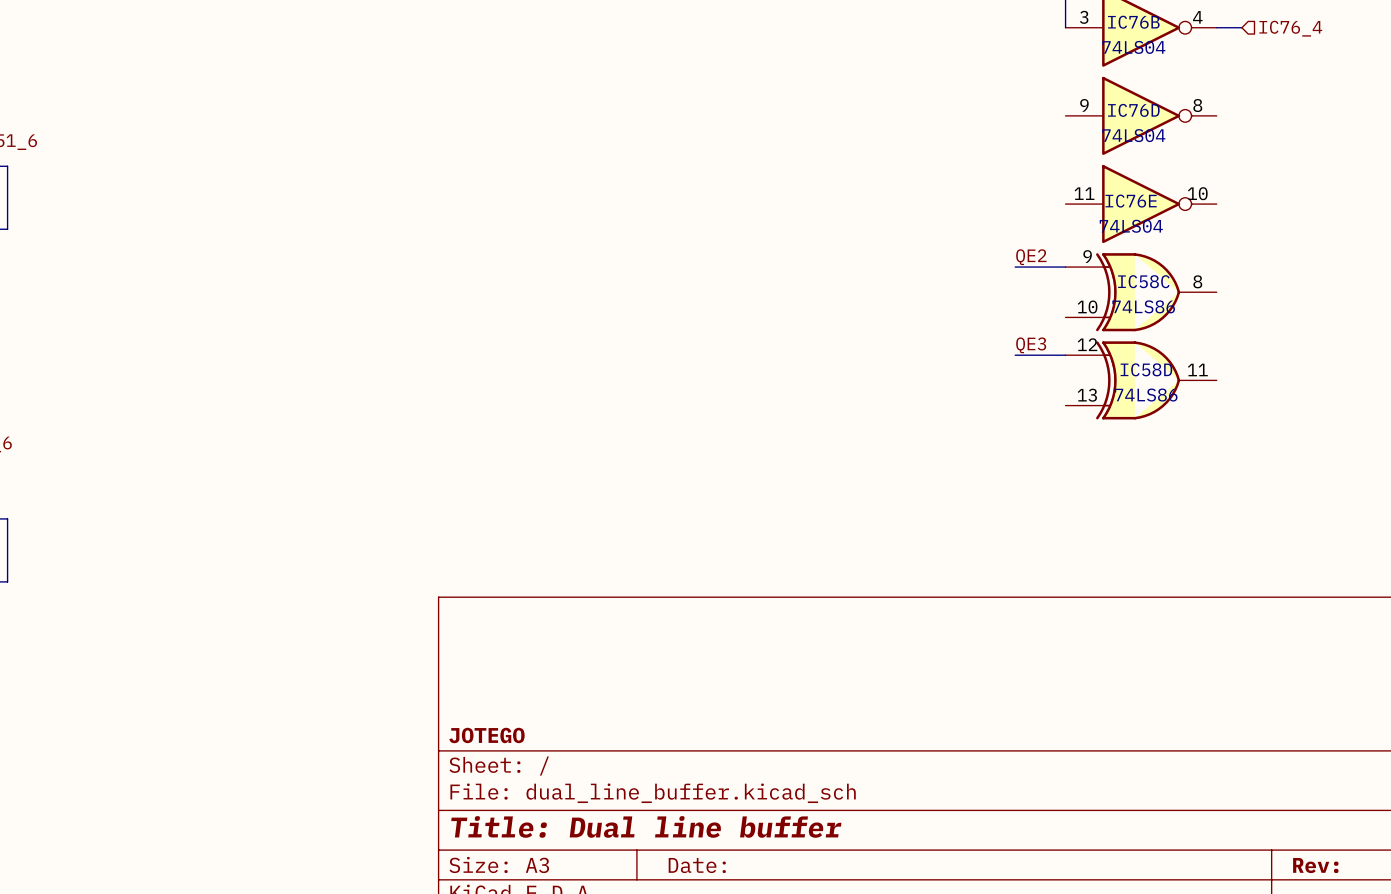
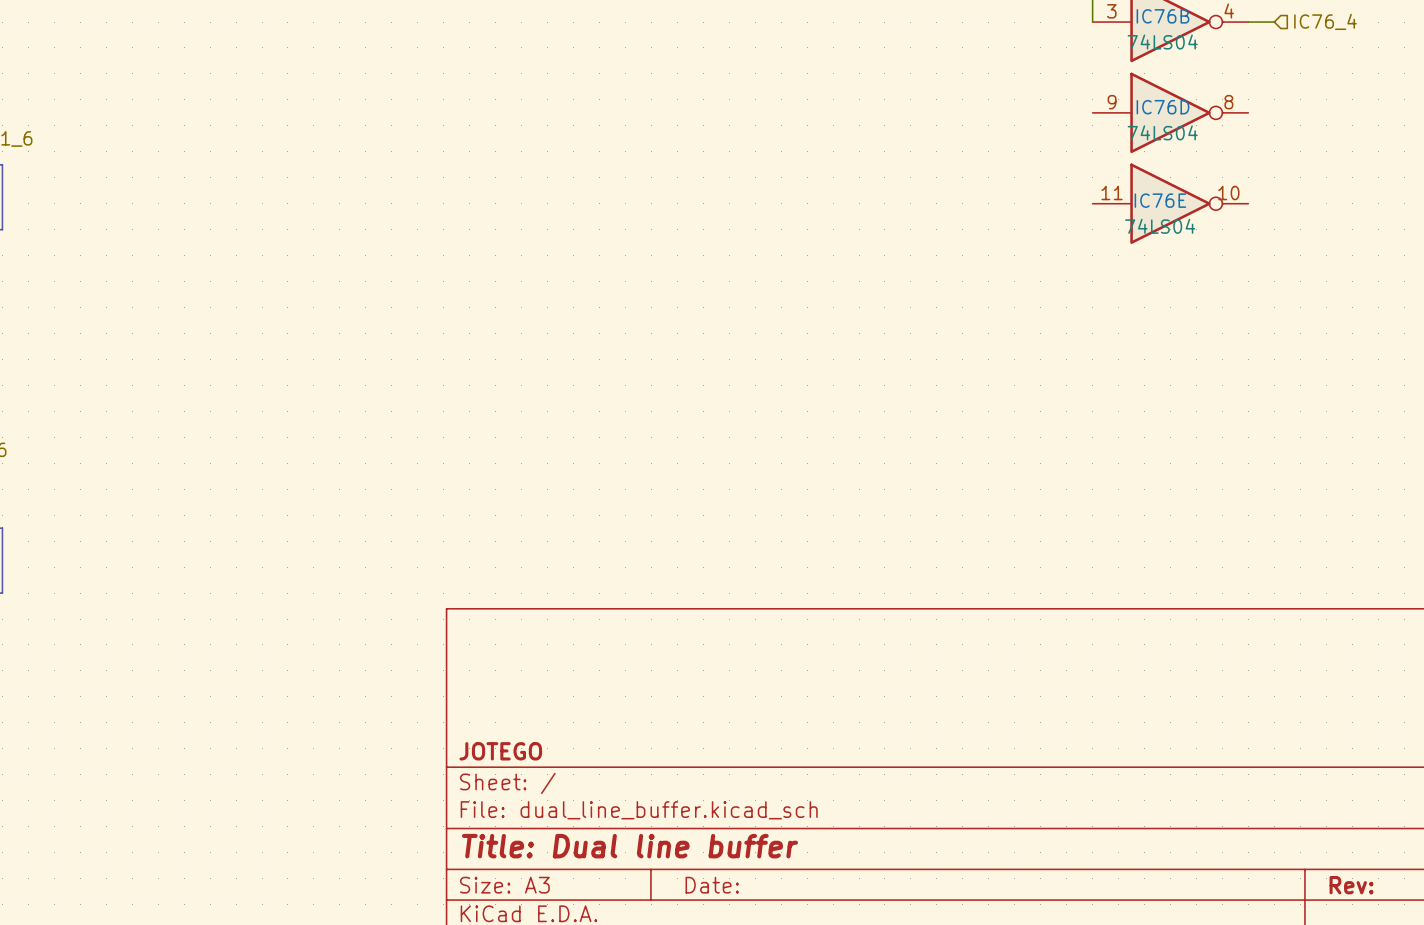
label: QE2 (1031, 257) -> none
wire: (1015, 267) (1065, 267) -> none
IC58C: 74LS86 (1141, 292) -> none
label: QE3 (1031, 345) -> none
wire: (1015, 355) (1065, 355) -> none
IC58D: 74LS86 (1141, 380) -> none

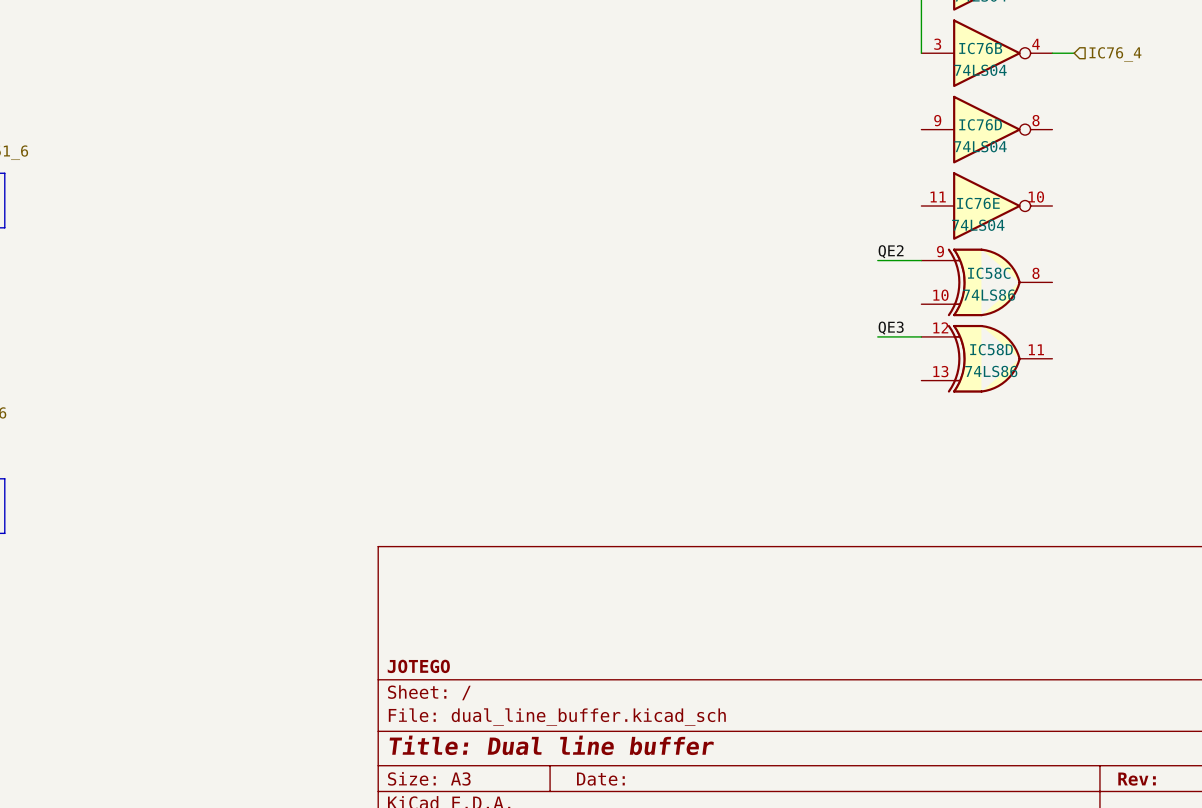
label: none -> QE2 (891, 251)
wire: none -> (877, 260) (921, 260)
IC58C: none -> 74LS86 (986, 282)
label: none -> QE3 (891, 328)
wire: none -> (877, 336) (921, 336)
IC58D: none -> 74LS86 (986, 358)

